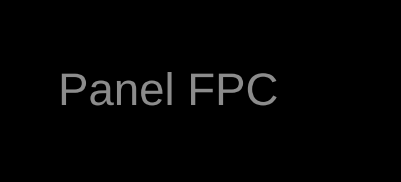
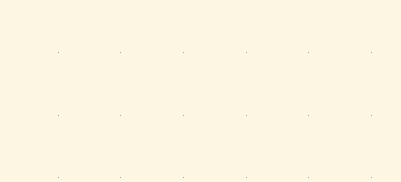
text: Panel FPC (169, 88) -> none

